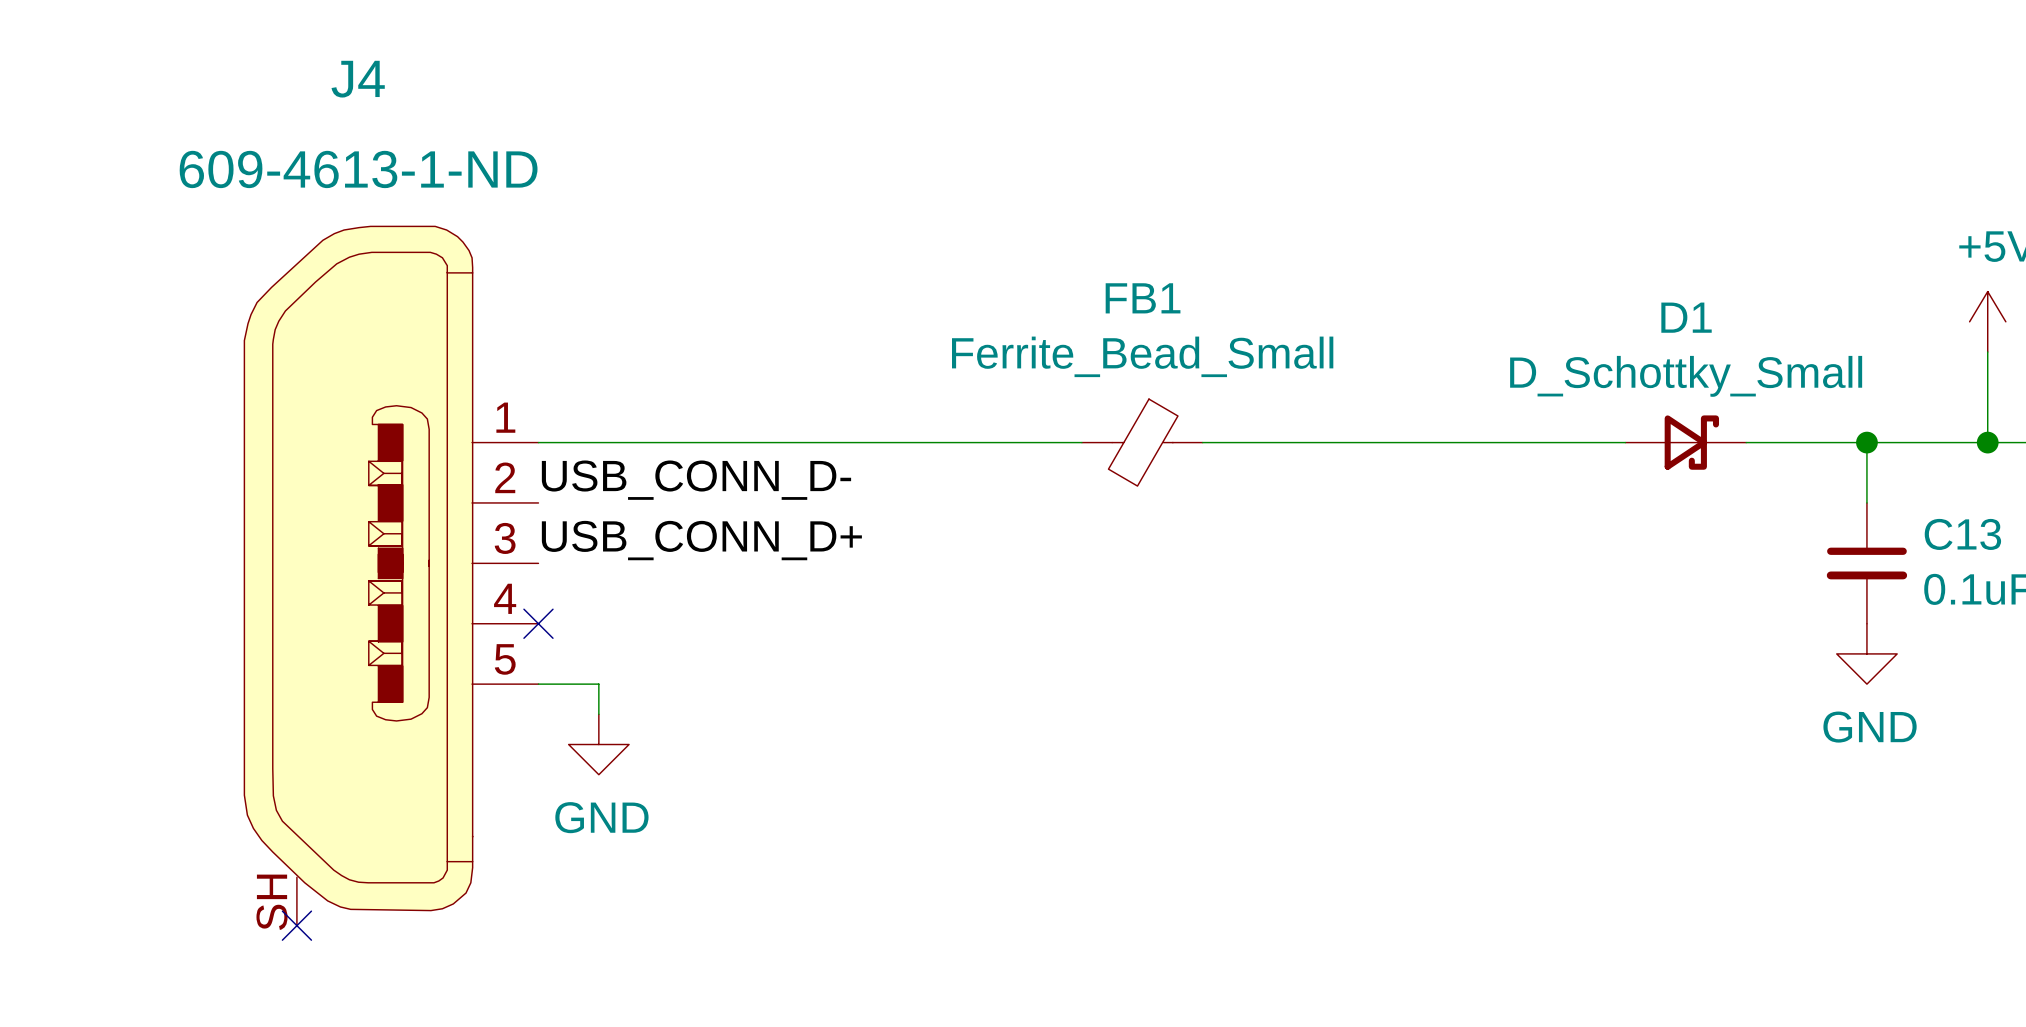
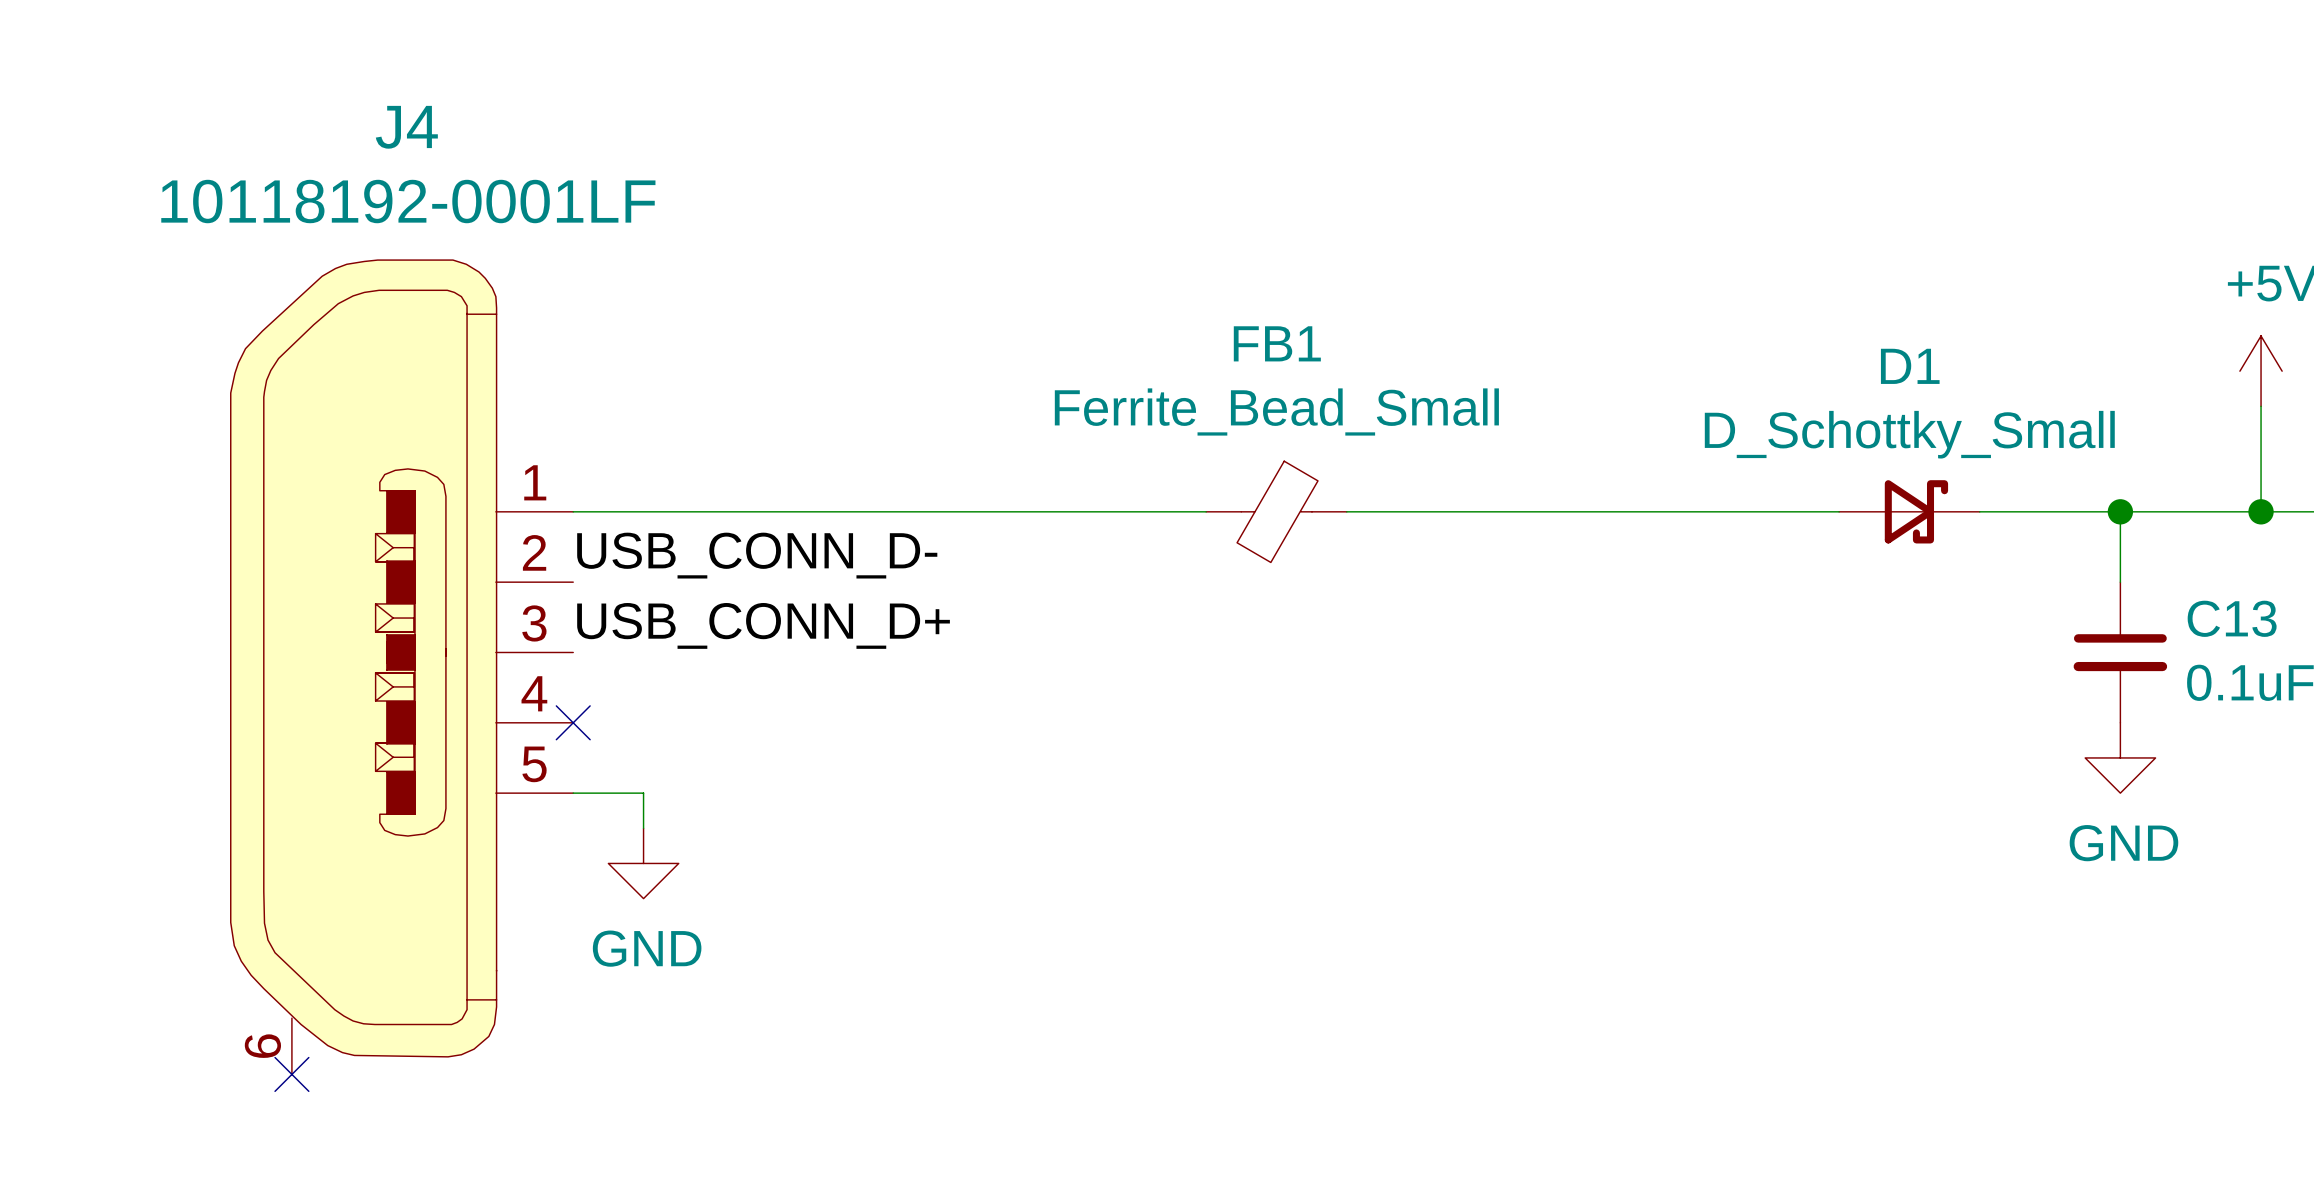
J4 name position: J4 (358, 79) -> J4 (406, 127)
J4 value: 609-4613-1-ND (358, 169) -> 10118192-0001LF (408, 201)
J4 pin number: SH (272, 902) -> 6 (262, 1046)

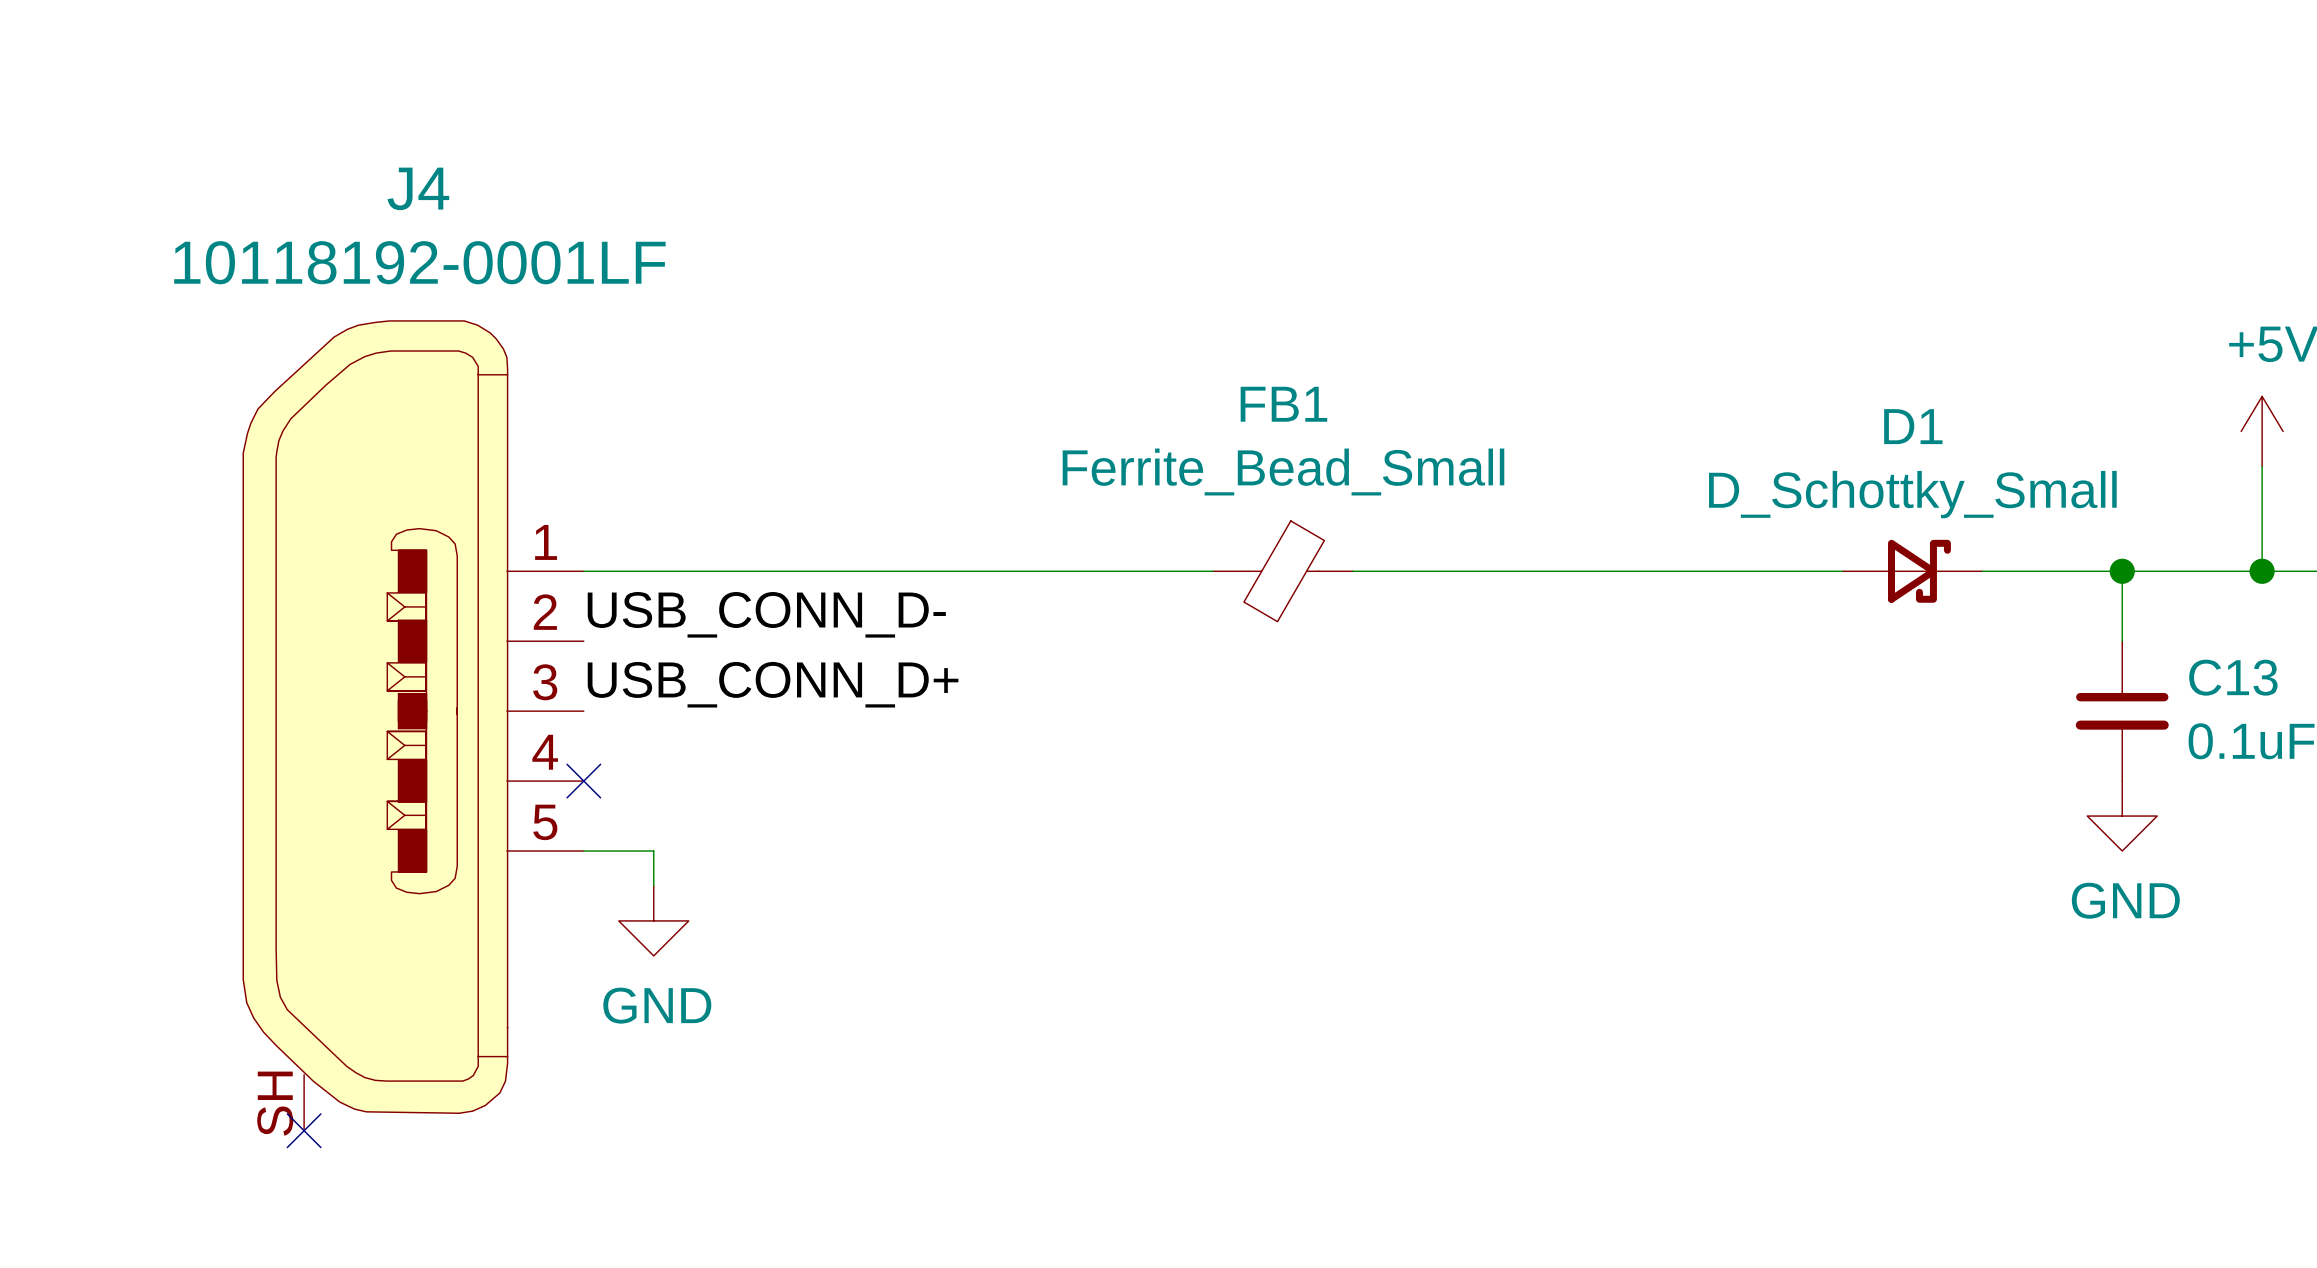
J4 pin number: 6 (262, 1046) -> SH (275, 1103)

